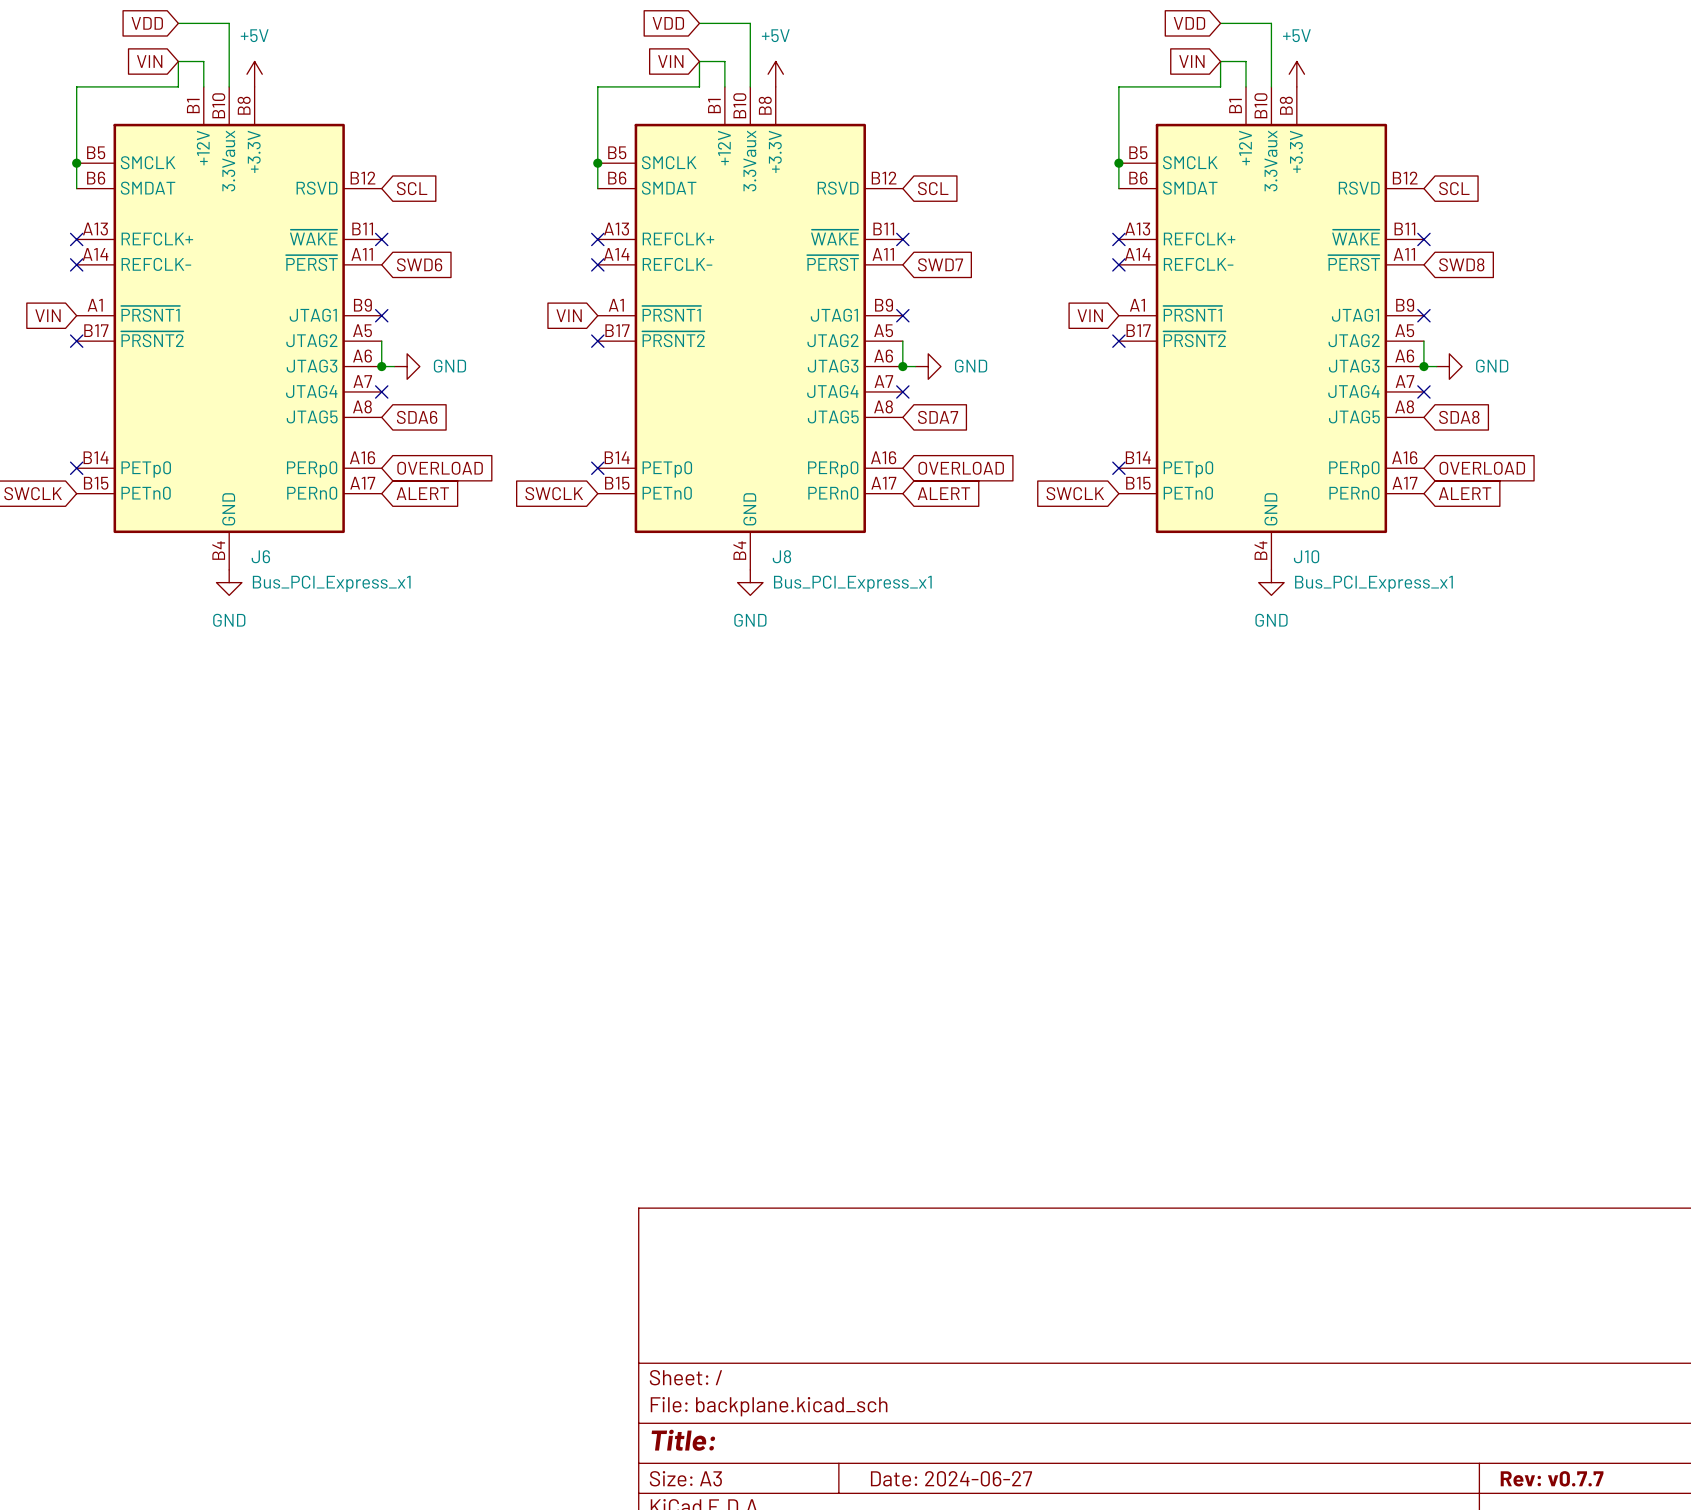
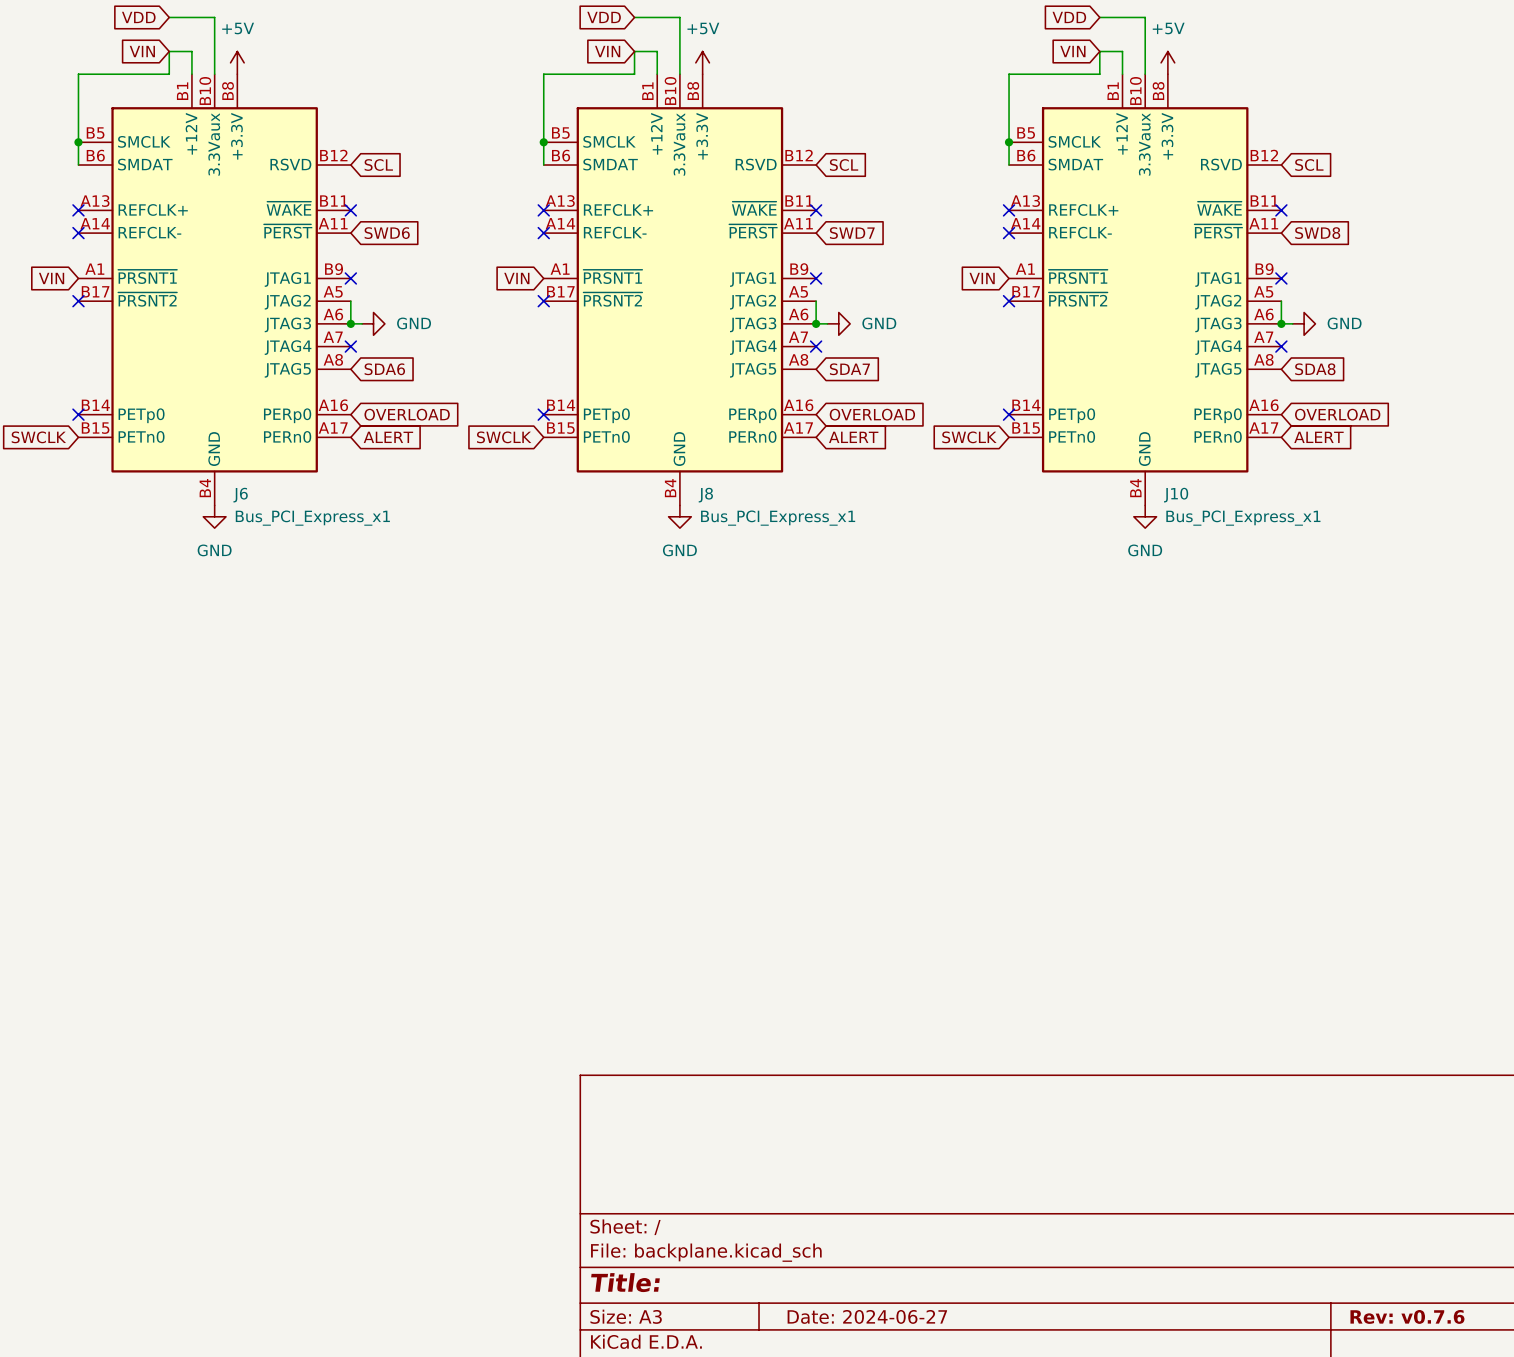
title block: Rev: v0.7.7 (1552, 1478) -> Rev: v0.7.6 (1407, 1316)

